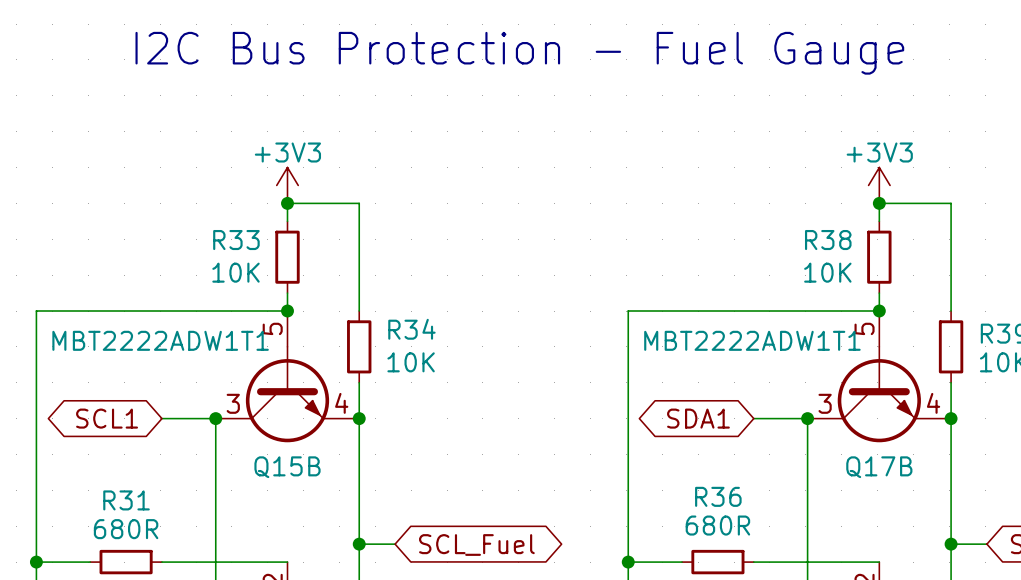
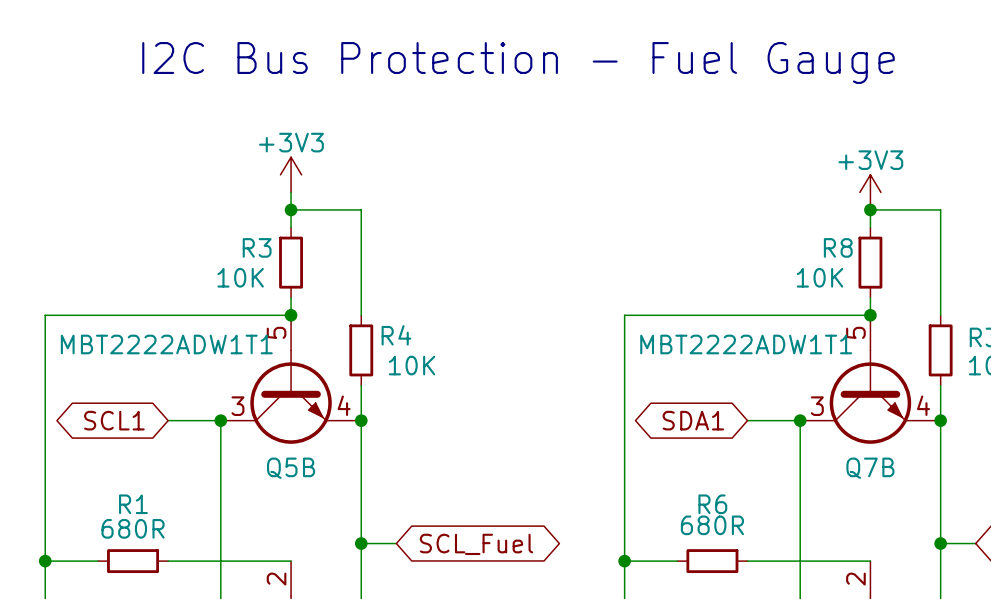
power symbol position: +3V3 (287, 185) -> +3V3 (291, 174)
R33 name: R33 (236, 240) -> R3 (257, 247)
R38 name: R38 (828, 240) -> R8 (838, 247)
R34 name: R34 (411, 329) -> R4 (396, 335)
Q15B name: Q15B (287, 467) -> Q5B (291, 468)
Q17B name: Q17B (879, 467) -> Q7B (870, 468)
R36 name: R36 (718, 496) -> R6 (712, 504)
R31 name: R31 (126, 500) -> R1 (133, 504)

